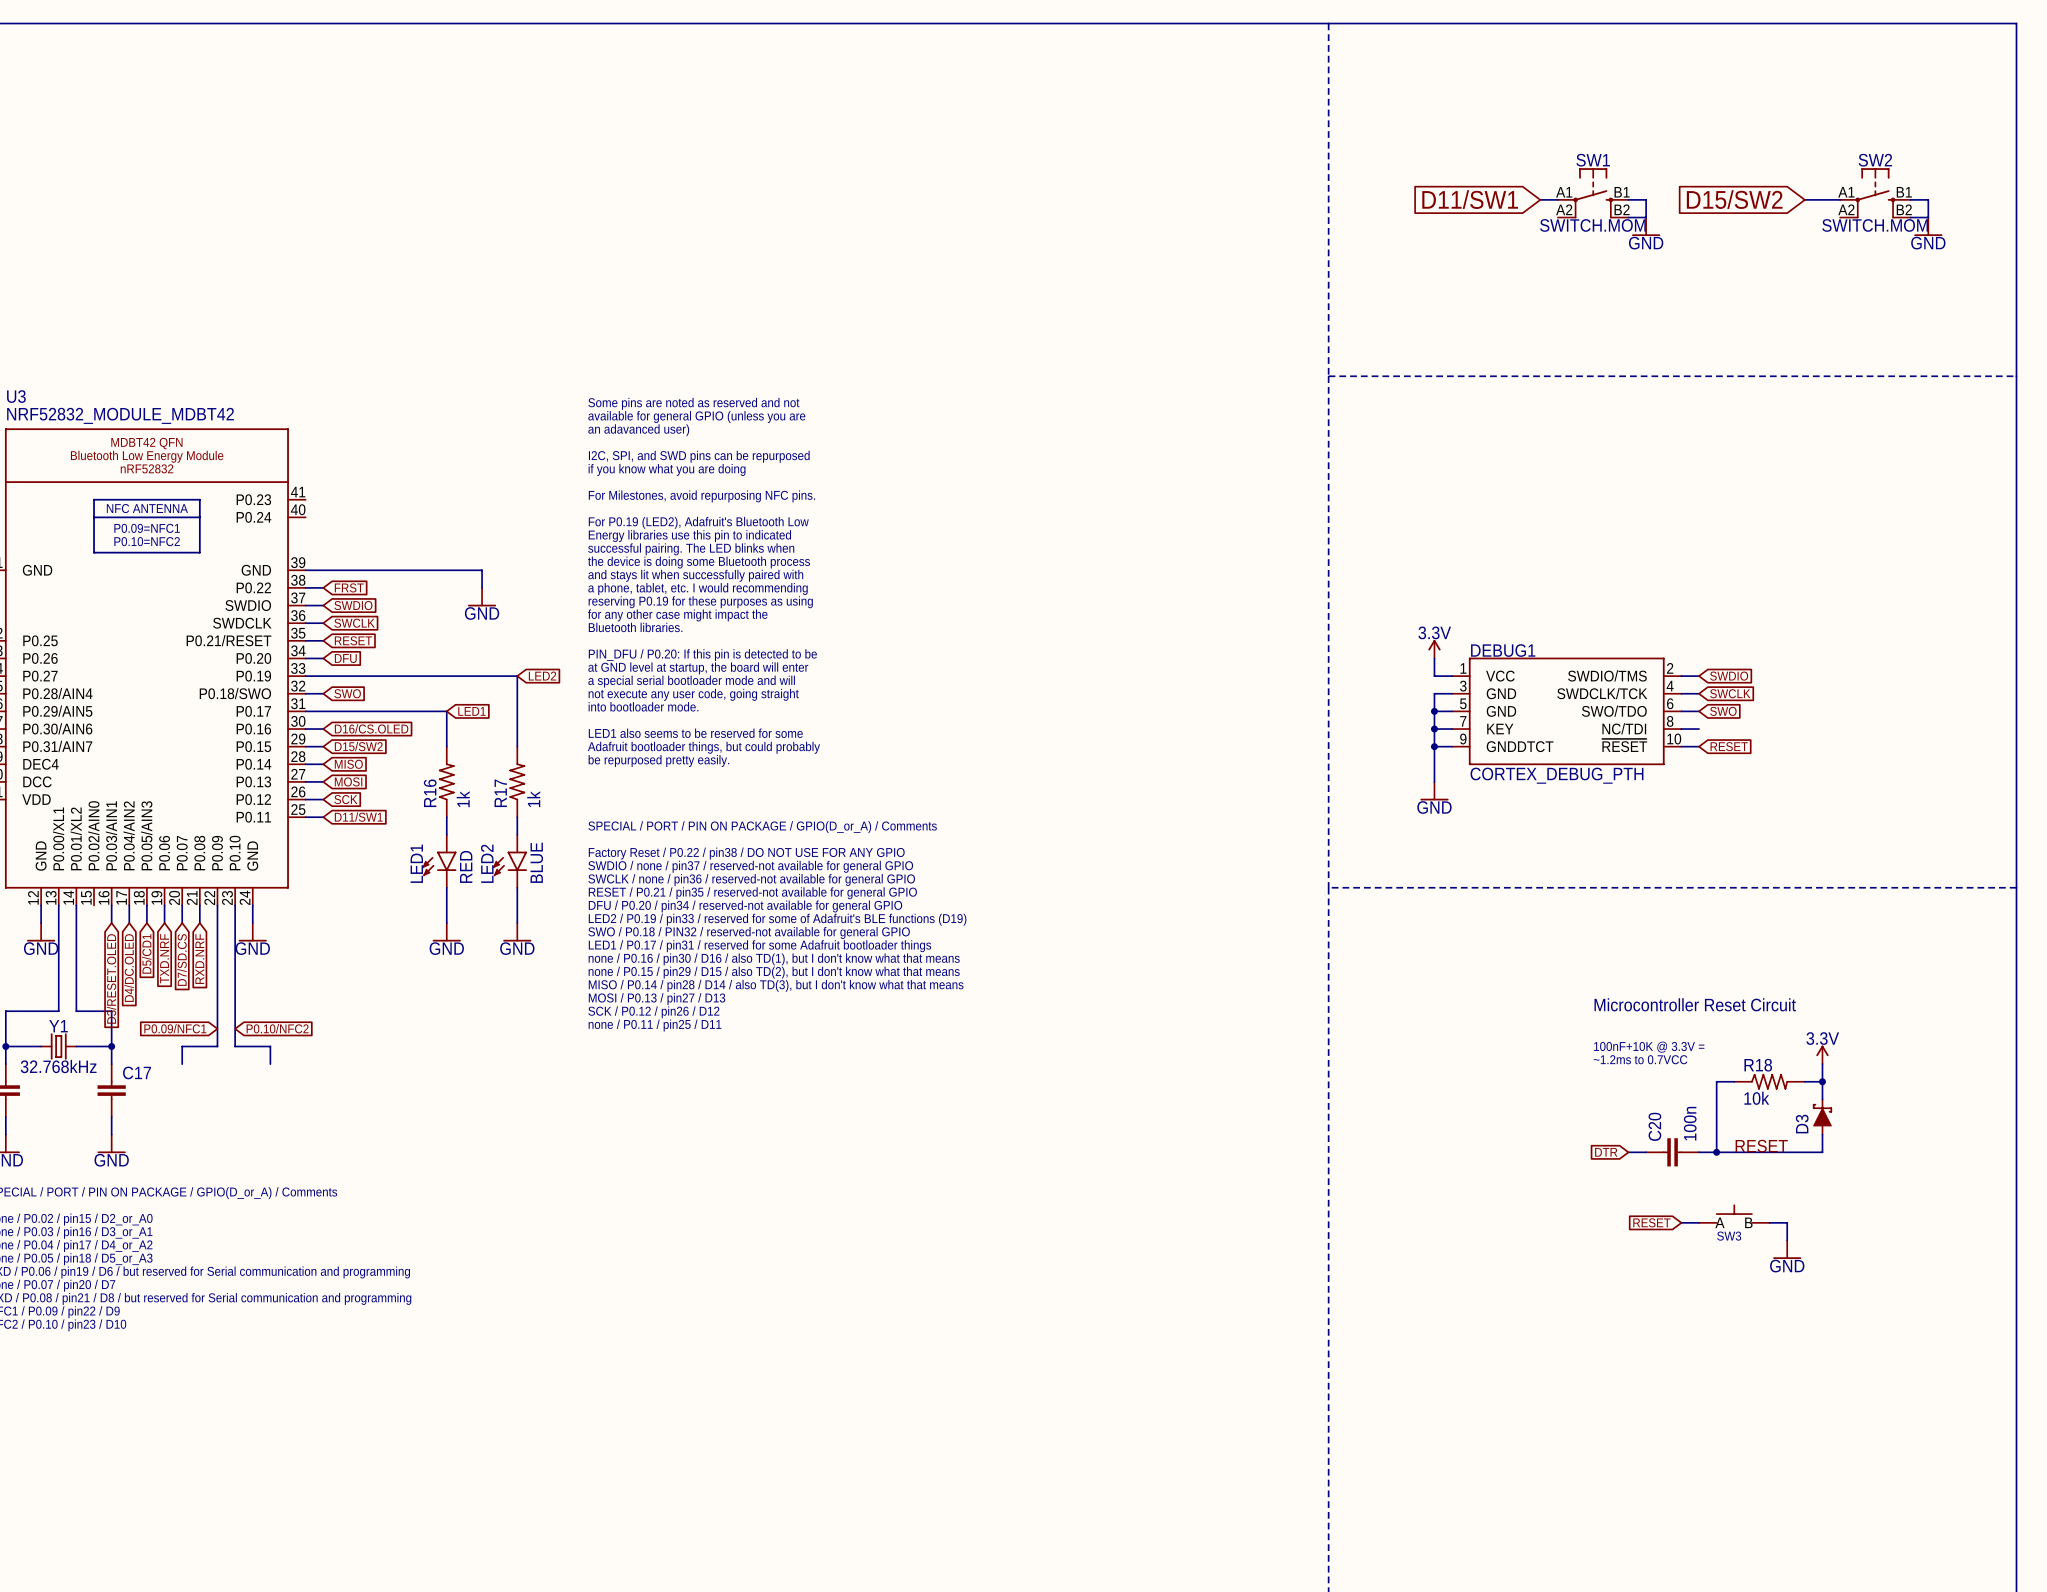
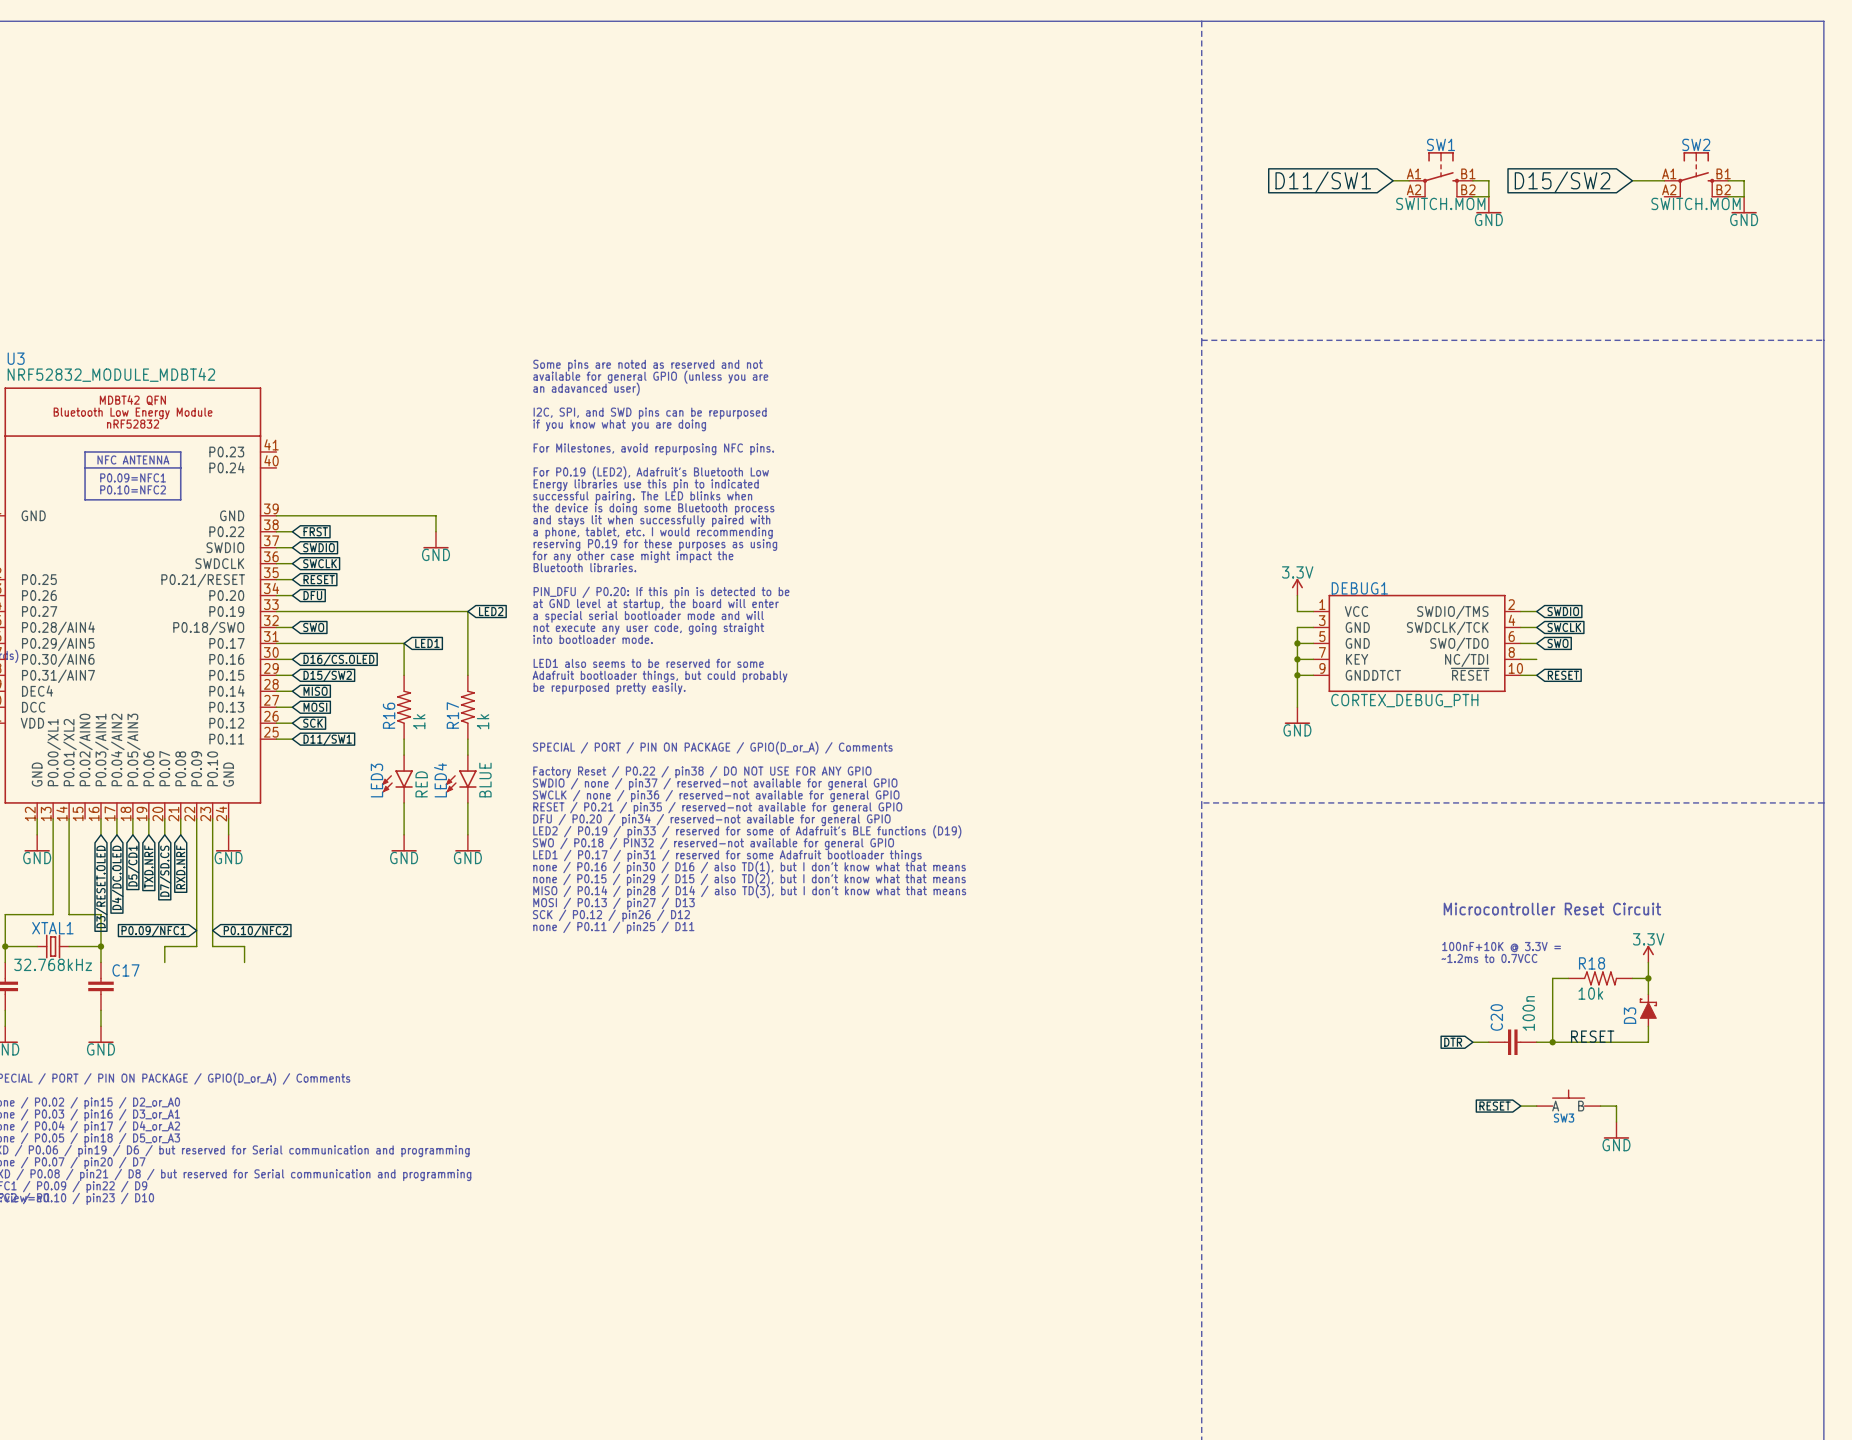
LED1 name: LED1 (416, 863) -> LED3 (376, 780)
LED2 name: LED2 (487, 863) -> LED4 (440, 780)
Y1 name: Y1 (58, 1026) -> XTAL1 (52, 928)

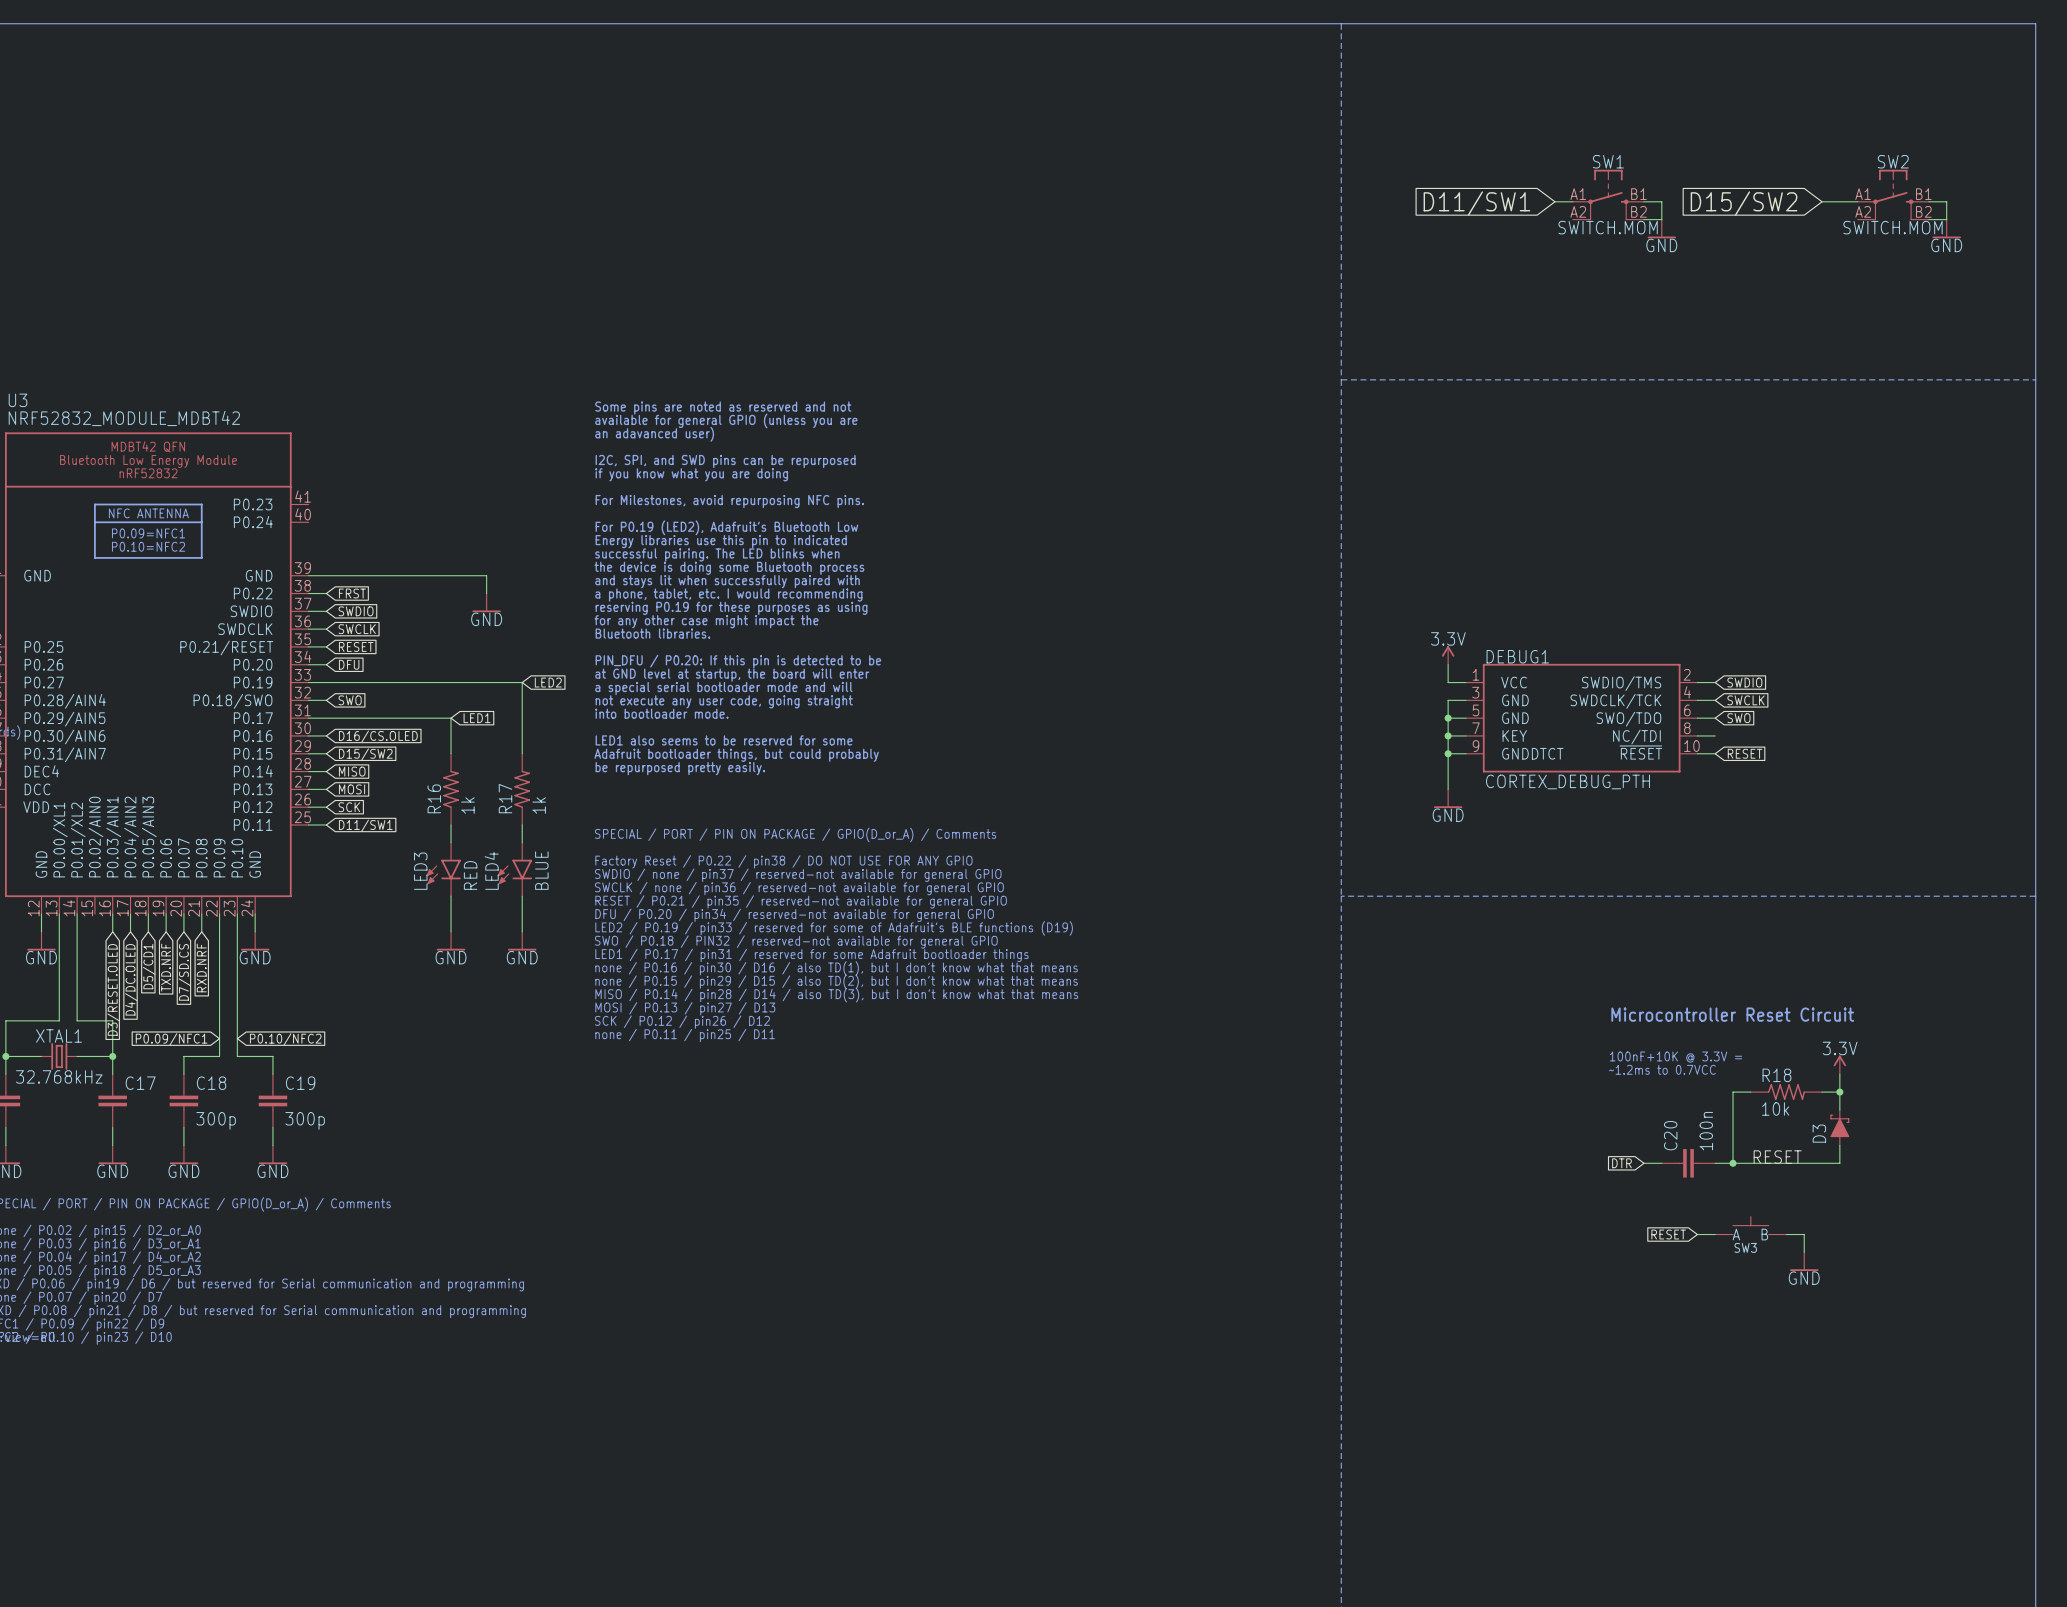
C18: none -> 300p (183, 1100)
C19: none -> 300p (272, 1100)
wire: none -> (183, 1127) (183, 1145)
wire: none -> (272, 1127) (272, 1145)
power symbol: none -> GND (183, 1154)
power symbol: none -> GND (272, 1154)

